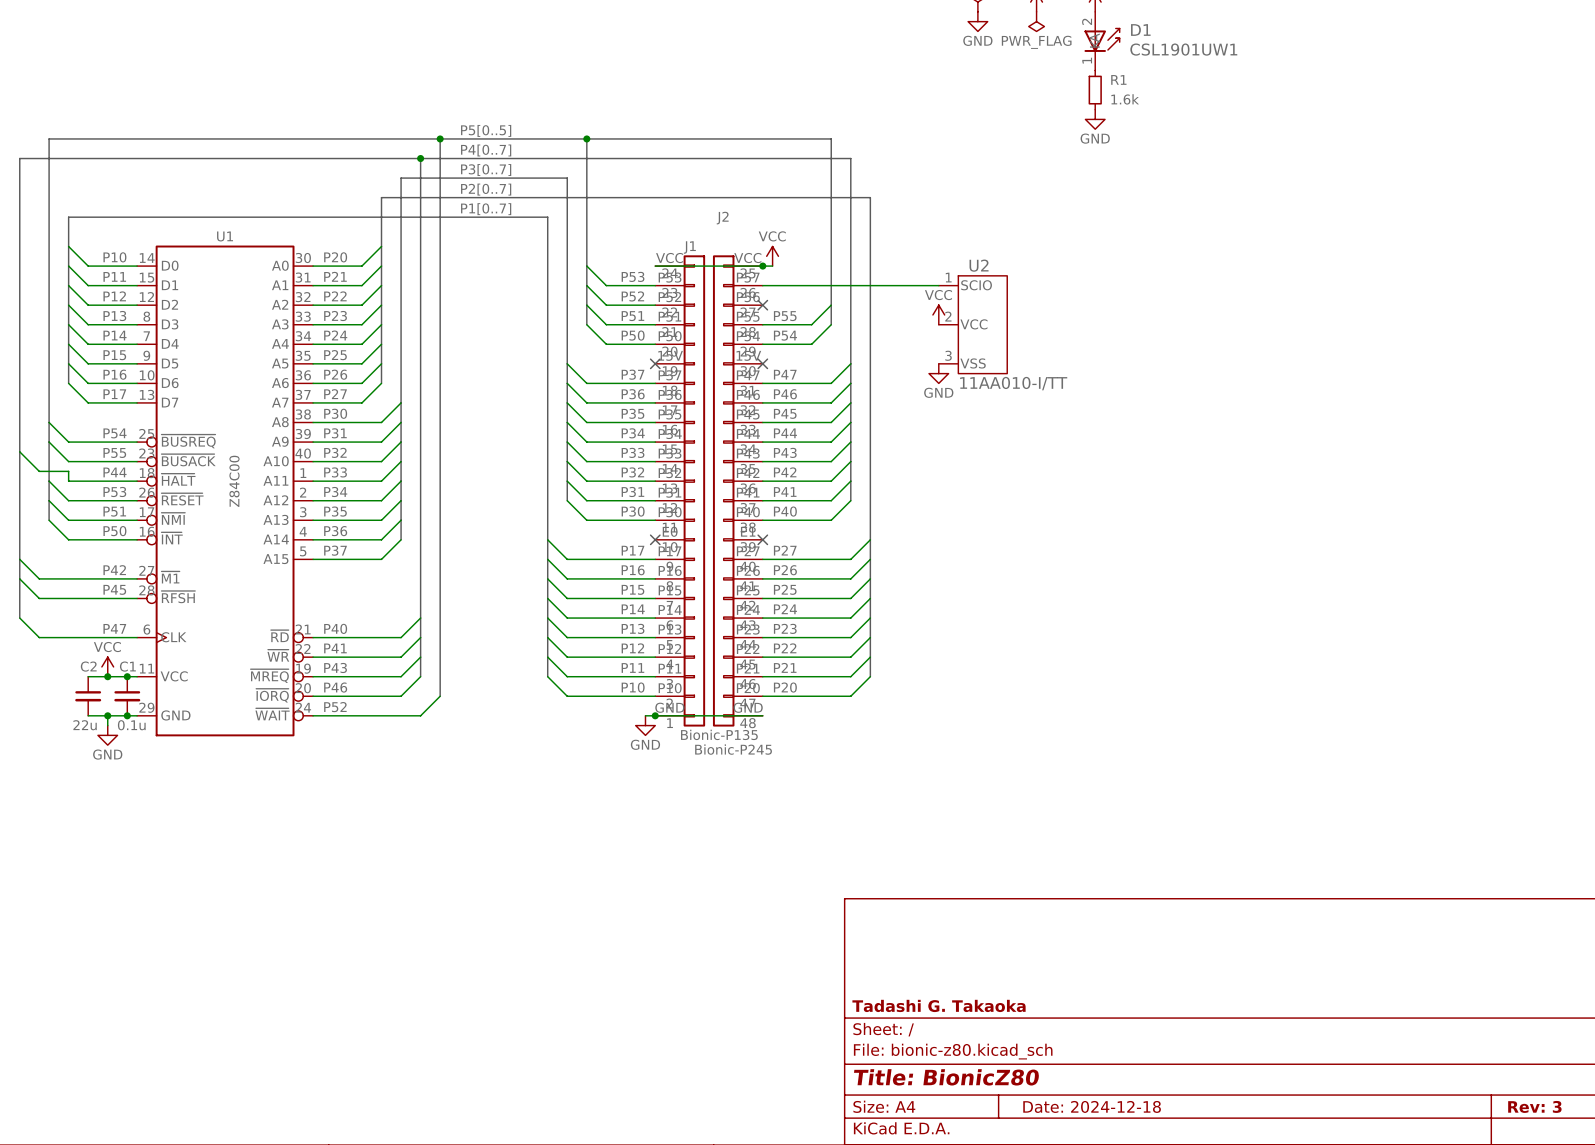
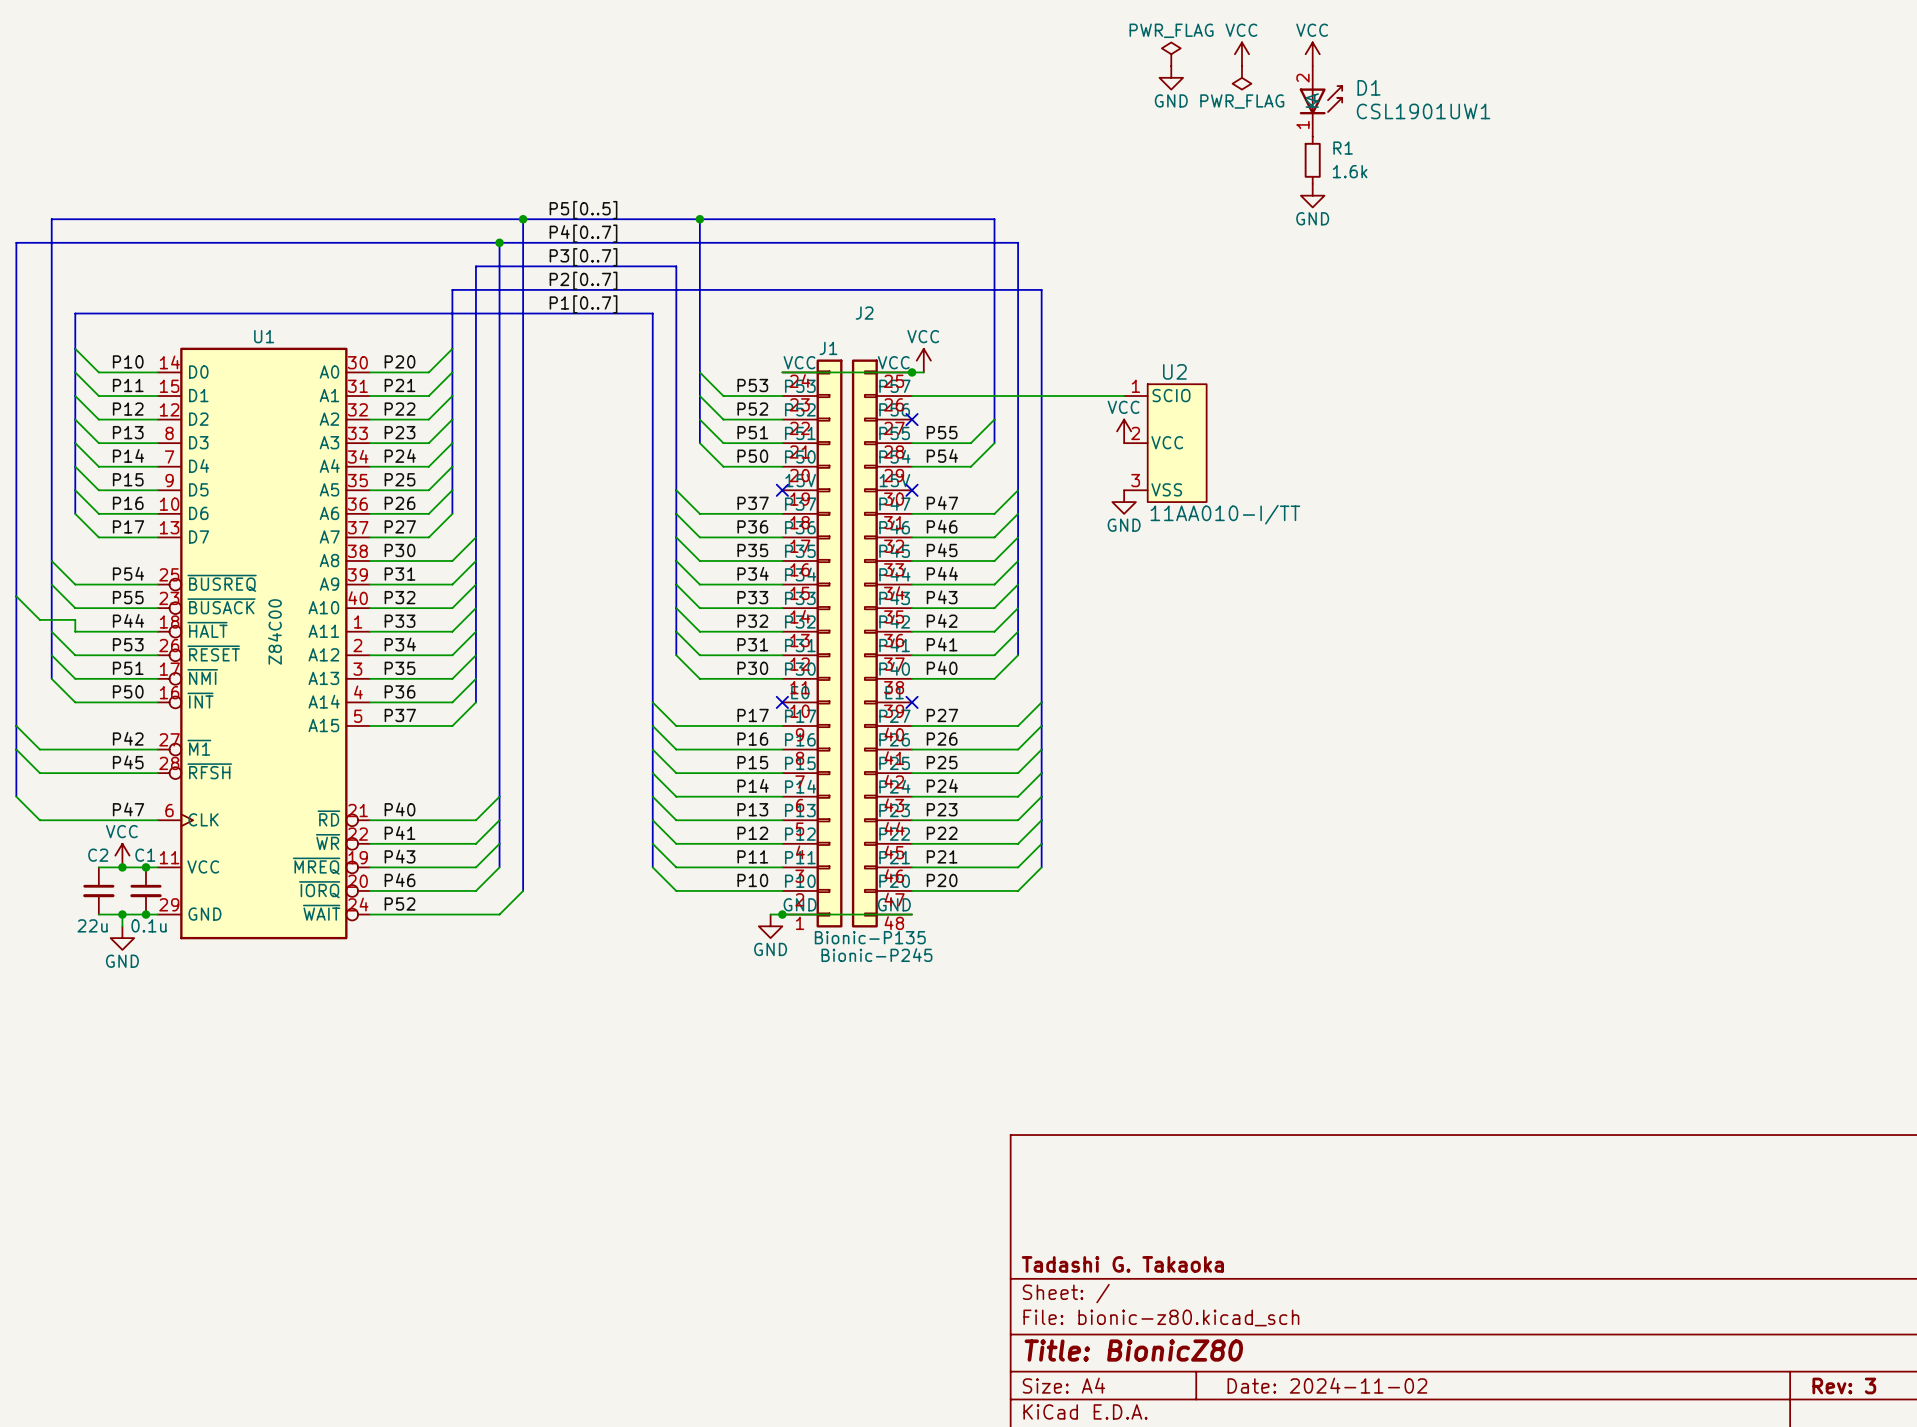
title block: Date: 2024-12-18 (1092, 1106) -> Date: 2024-11-02 (1327, 1385)

